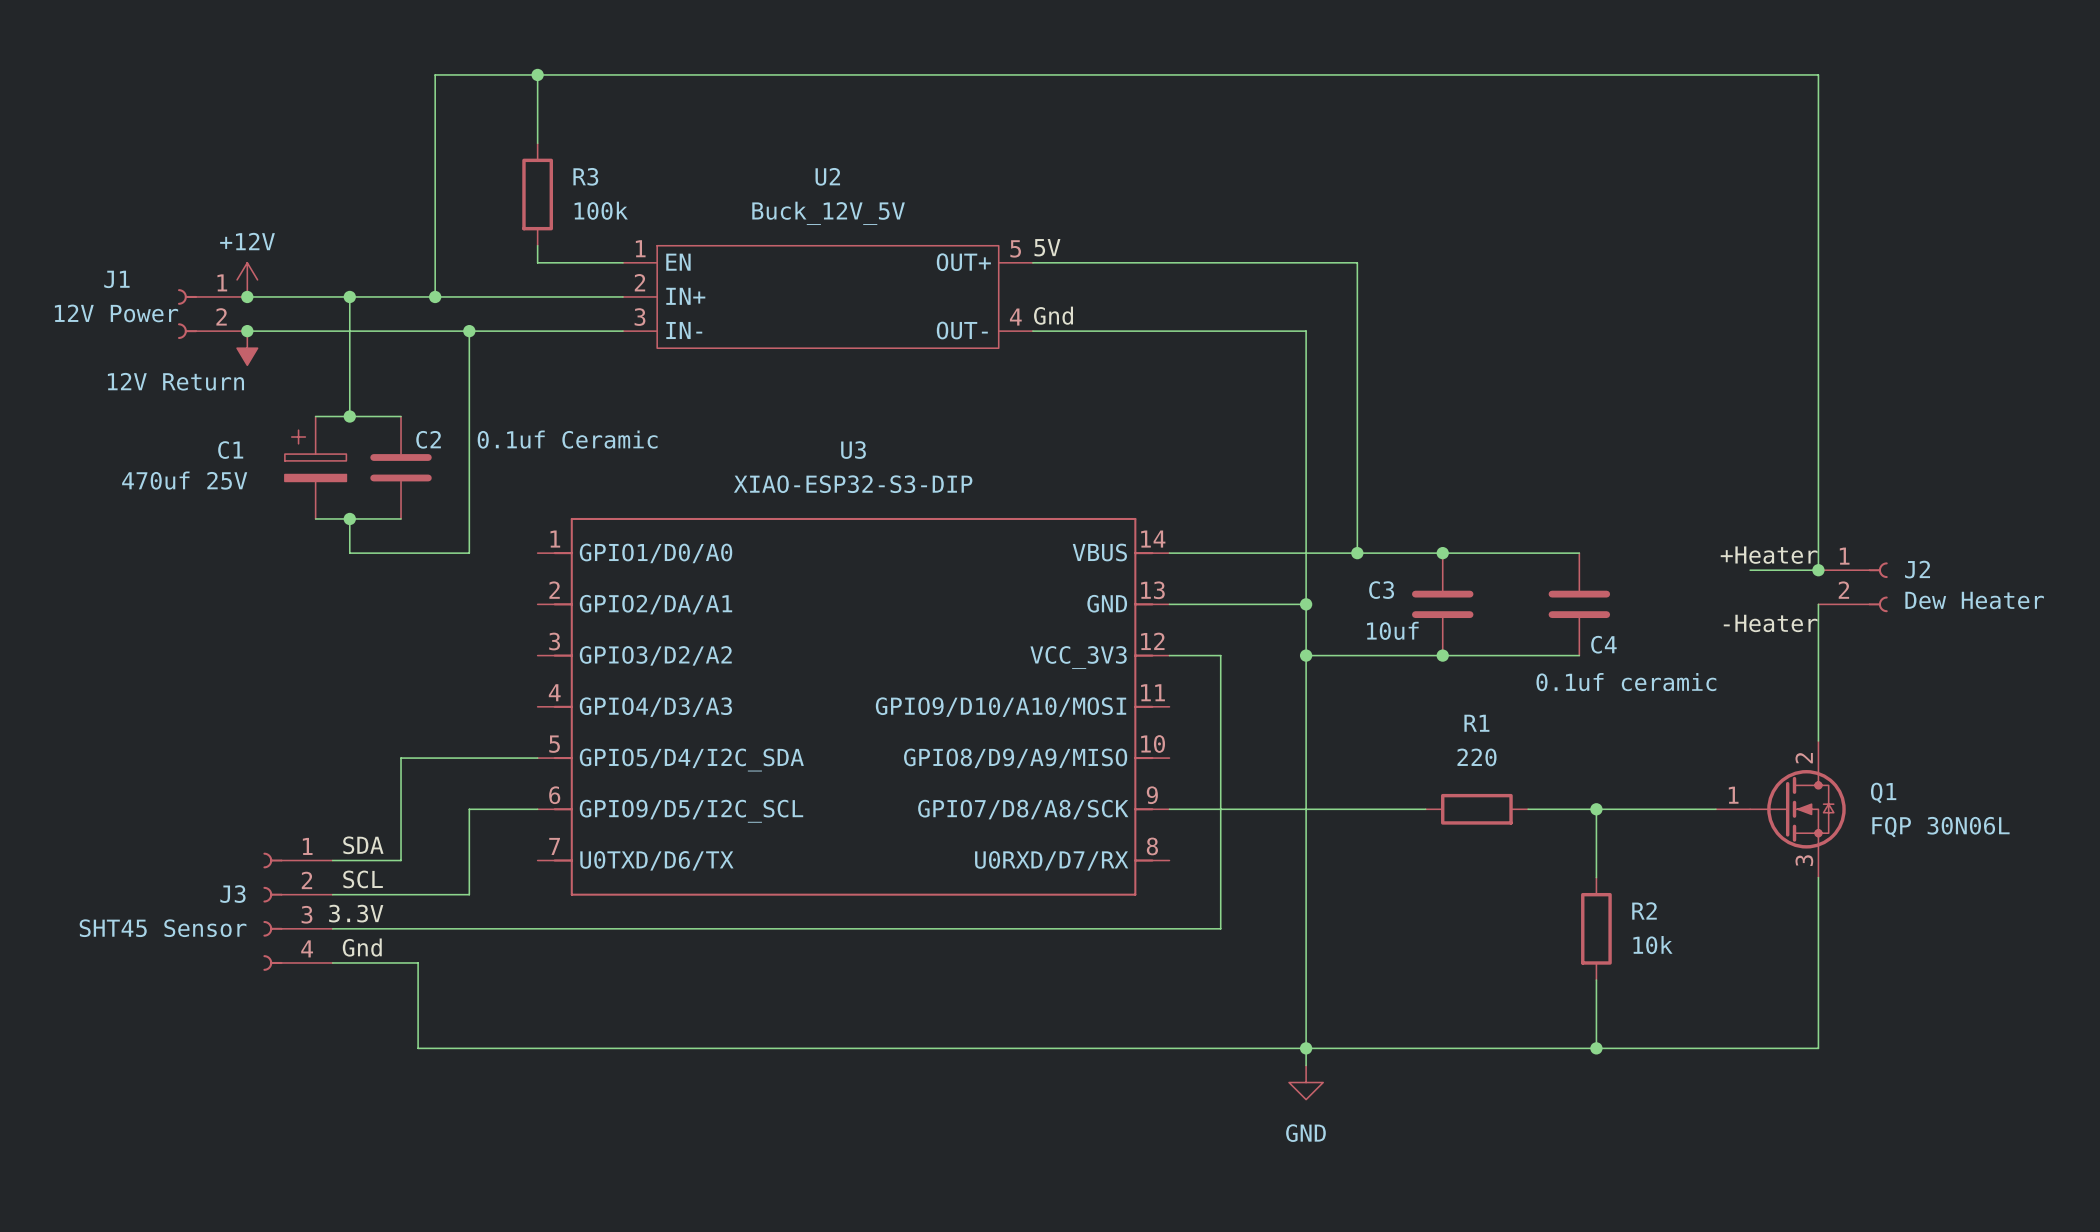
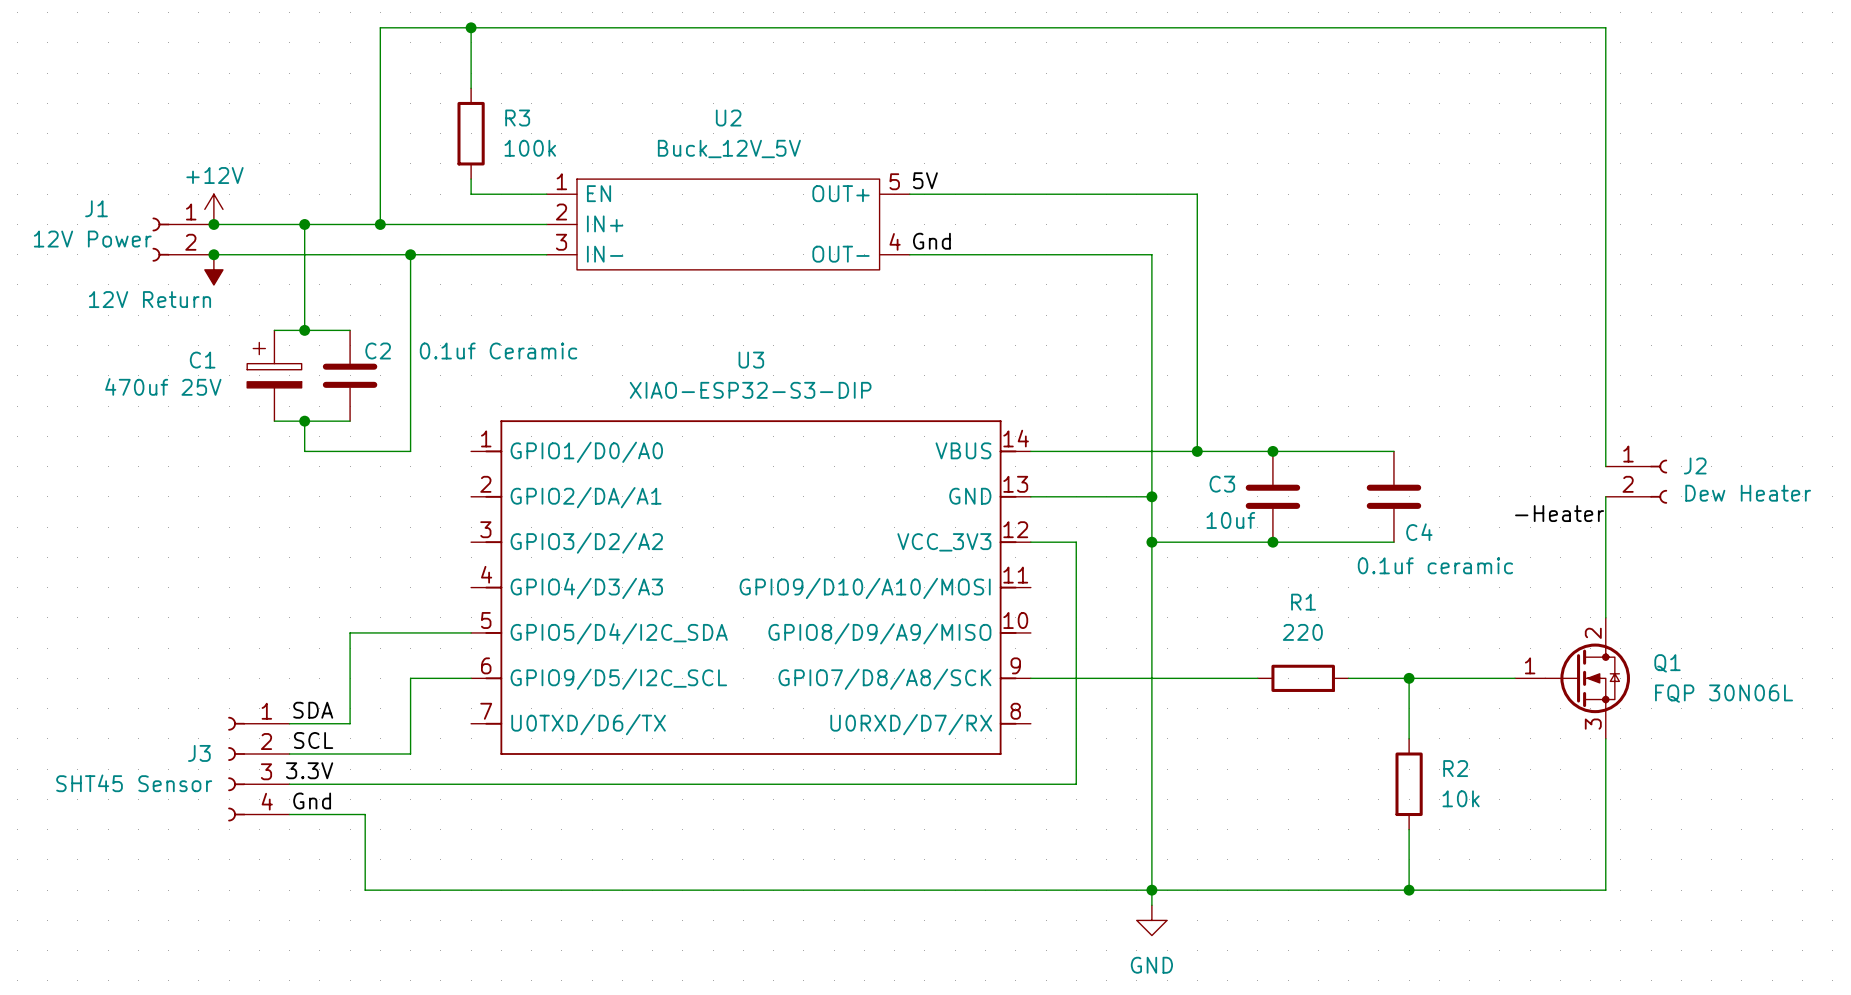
label: +Heater (1769, 555) -> none
wire: (1750, 570) (1818, 570) -> none
junction: (1818, 570) -> none

